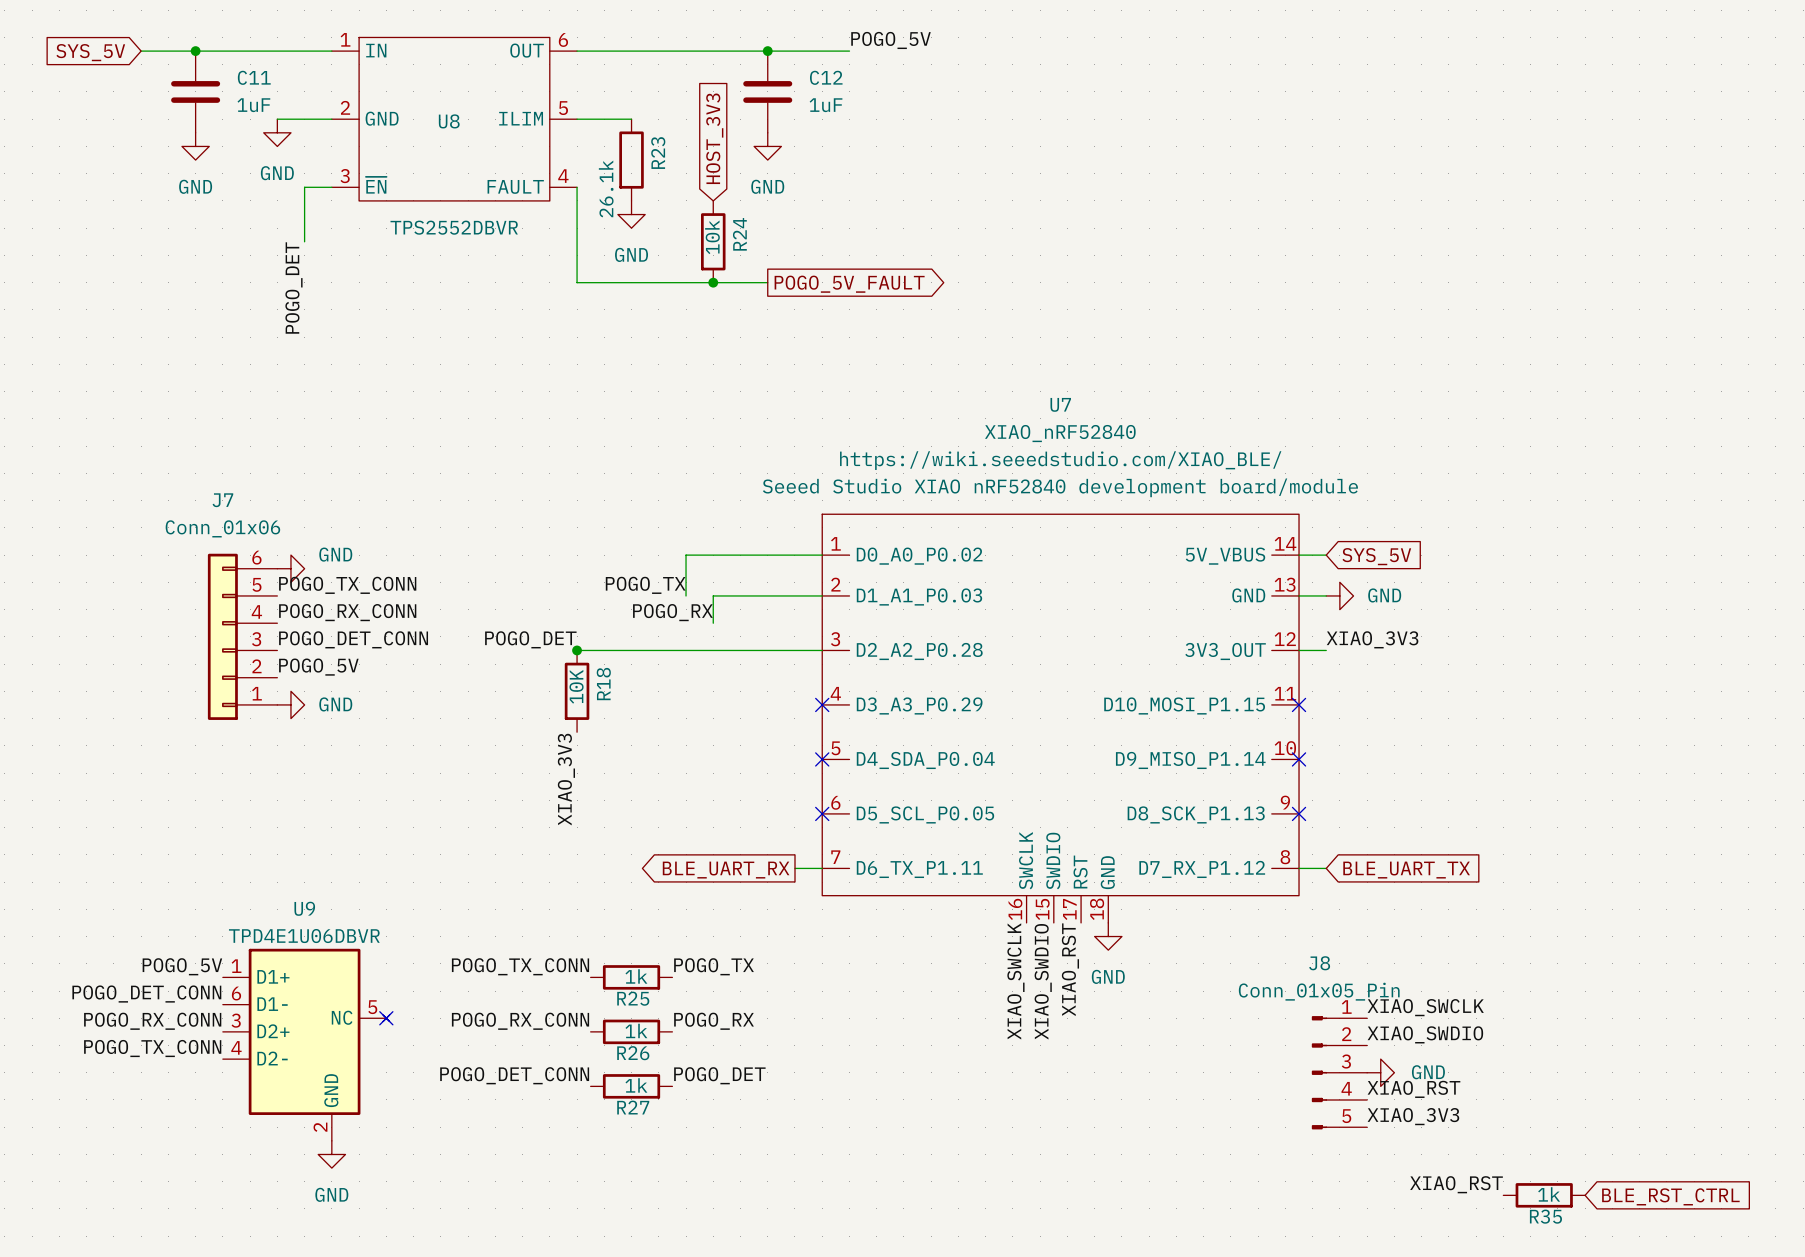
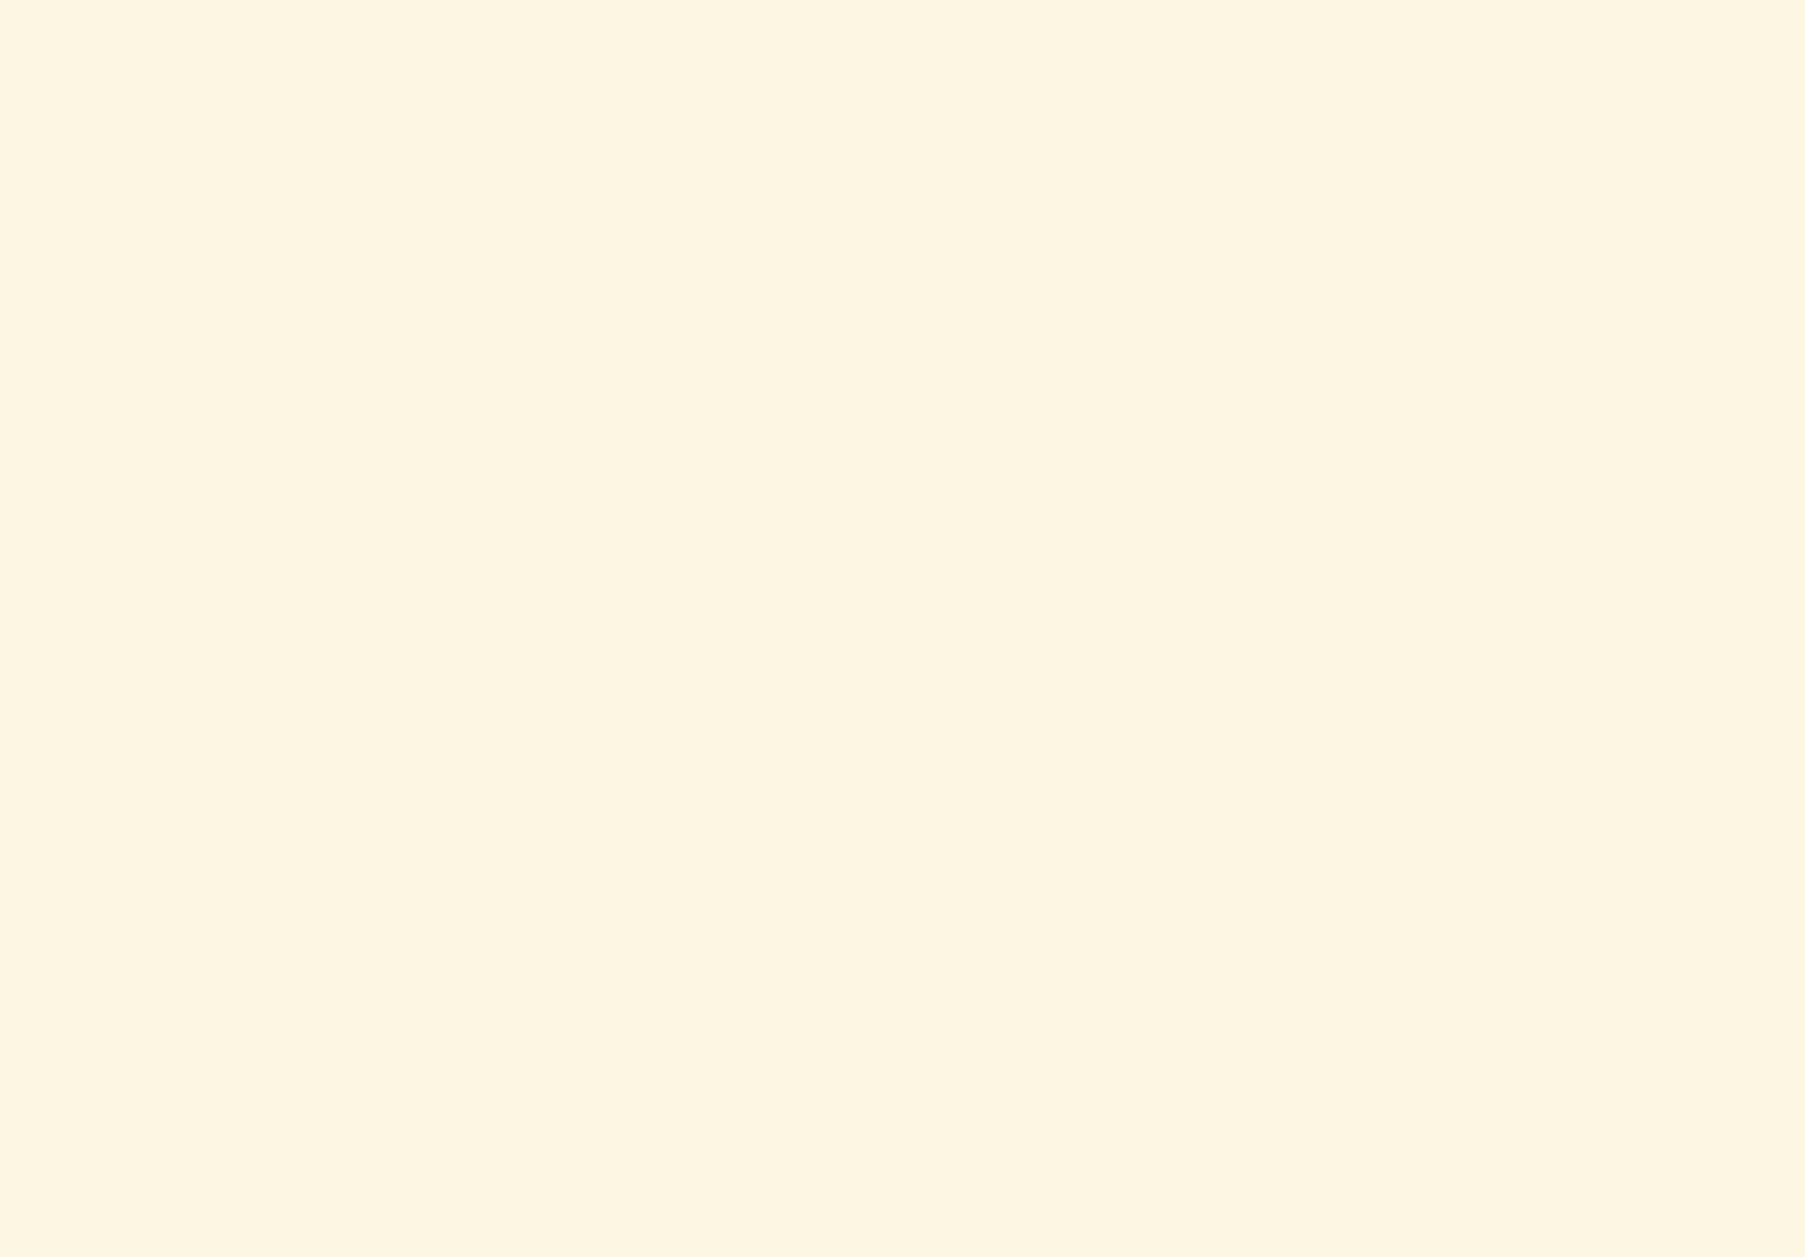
label: POGO_5V (891, 40) -> none
wire: (141, 51) (331, 51) -> none
junction: (195, 51) -> none
wire: (577, 51) (849, 51) -> none
junction: (767, 51) -> none
global label: SYS_5V (90, 52) -> none
C11: 1uF (195, 91) -> none
C12: 1uF (767, 91) -> none
wire: (277, 119) (331, 119) -> none
U8: TPS2552DBVR (454, 119) -> none
wire: (577, 119) (631, 119) -> none
power symbol: GND (277, 132) -> none
global label: HOST_3V3 (714, 138) -> none
power symbol: GND (195, 146) -> none
power symbol: GND (767, 146) -> none
R23: 26.1k (631, 160) -> none
wire: (331, 187) (304, 187) (304, 241) -> none
wire: (577, 187) (577, 282) (767, 282) -> none
power symbol: GND (631, 214) -> none
R24: 10k (713, 241) -> none
junction: (713, 282) -> none
global label: POGO_5V_FAULT (849, 284) -> none
label: POGO_DET (293, 288) -> none
wire: (822, 555) (686, 555) (686, 595) -> none
wire: (1299, 555) (1326, 555) -> none
global label: SYS_5V (1376, 556) -> none
power symbol: GND (290, 568) -> none
label: POGO_TX_CONN (347, 585) -> none
label: POGO_TX (645, 585) -> none
wire: (822, 595) (713, 595) (713, 623) -> none
wire: (1299, 595) (1326, 595) -> none
power symbol: GND (1339, 595) -> none
label: POGO_RX_CONN (347, 612) -> none
label: POGO_RX (672, 612) -> none
J7: Conn_01x06 (242, 636) -> none
label: POGO_DET_CONN (353, 639) -> none
label: POGO_DET (530, 639) -> none
label: XIAO_3V3 (1372, 639) -> none
wire: (577, 650) (822, 650) -> none
junction: (577, 650) -> none
wire: (1299, 650) (1326, 650) -> none
label: POGO_5V (318, 667) -> none
R18: 10K (577, 691) -> none
power symbol: GND (290, 704) -> none
no-connect mark: (822, 704) -> none
no-connect mark: (1299, 704) -> none
U7: XIAO_nRF52840 (1060, 718) -> none
no-connect mark: (822, 759) -> none
no-connect mark: (1299, 759) -> none
label: XIAO_3V3 (566, 779) -> none
no-connect mark: (822, 813) -> none
no-connect mark: (1299, 813) -> none
wire: (794, 868) (822, 868) -> none
wire: (1299, 868) (1326, 868) -> none
global label: BLE_UART_RX (726, 870) -> none
global label: BLE_UART_TX (1406, 870) -> none
power symbol: GND (1108, 936) -> none
label: POGO_5V (182, 966) -> none
label: POGO_TX_CONN (520, 966) -> none
label: POGO_TX (714, 966) -> none
label: XIAO_RST (1070, 969) -> none
R25: 1k (631, 977) -> none
label: XIAO_SWCLK (1015, 981) -> none
label: XIAO_SWDIO (1043, 981) -> none
label: POGO_DET_CONN (146, 994) -> none
label: XIAO_SWCLK (1425, 1007) -> none
no-connect mark: (386, 1018) -> none
label: POGO_RX_CONN (152, 1021) -> none
label: POGO_RX_CONN (520, 1021) -> none
label: POGO_RX (714, 1021) -> none
R26: 1k (631, 1031) -> none
label: XIAO_SWDIO (1425, 1034) -> none
U9: TPD4E1U06DBVR (306, 1044) -> none
label: POGO_TX_CONN (152, 1048) -> none
J8: Conn_01x05_Pin (1339, 1072) -> none
power symbol: GND (1380, 1072) -> none
label: POGO_DET_CONN (514, 1075) -> none
label: POGO_DET (719, 1075) -> none
R27: 1k (631, 1086) -> none
label: XIAO_RST (1413, 1089) -> none
label: XIAO_3V3 (1413, 1116) -> none
power symbol: GND (331, 1154) -> none
label: XIAO_RST (1456, 1184) -> none
R35: 1k (1544, 1195) -> none
global label: BLE_RST_CTRL (1670, 1196) -> none

